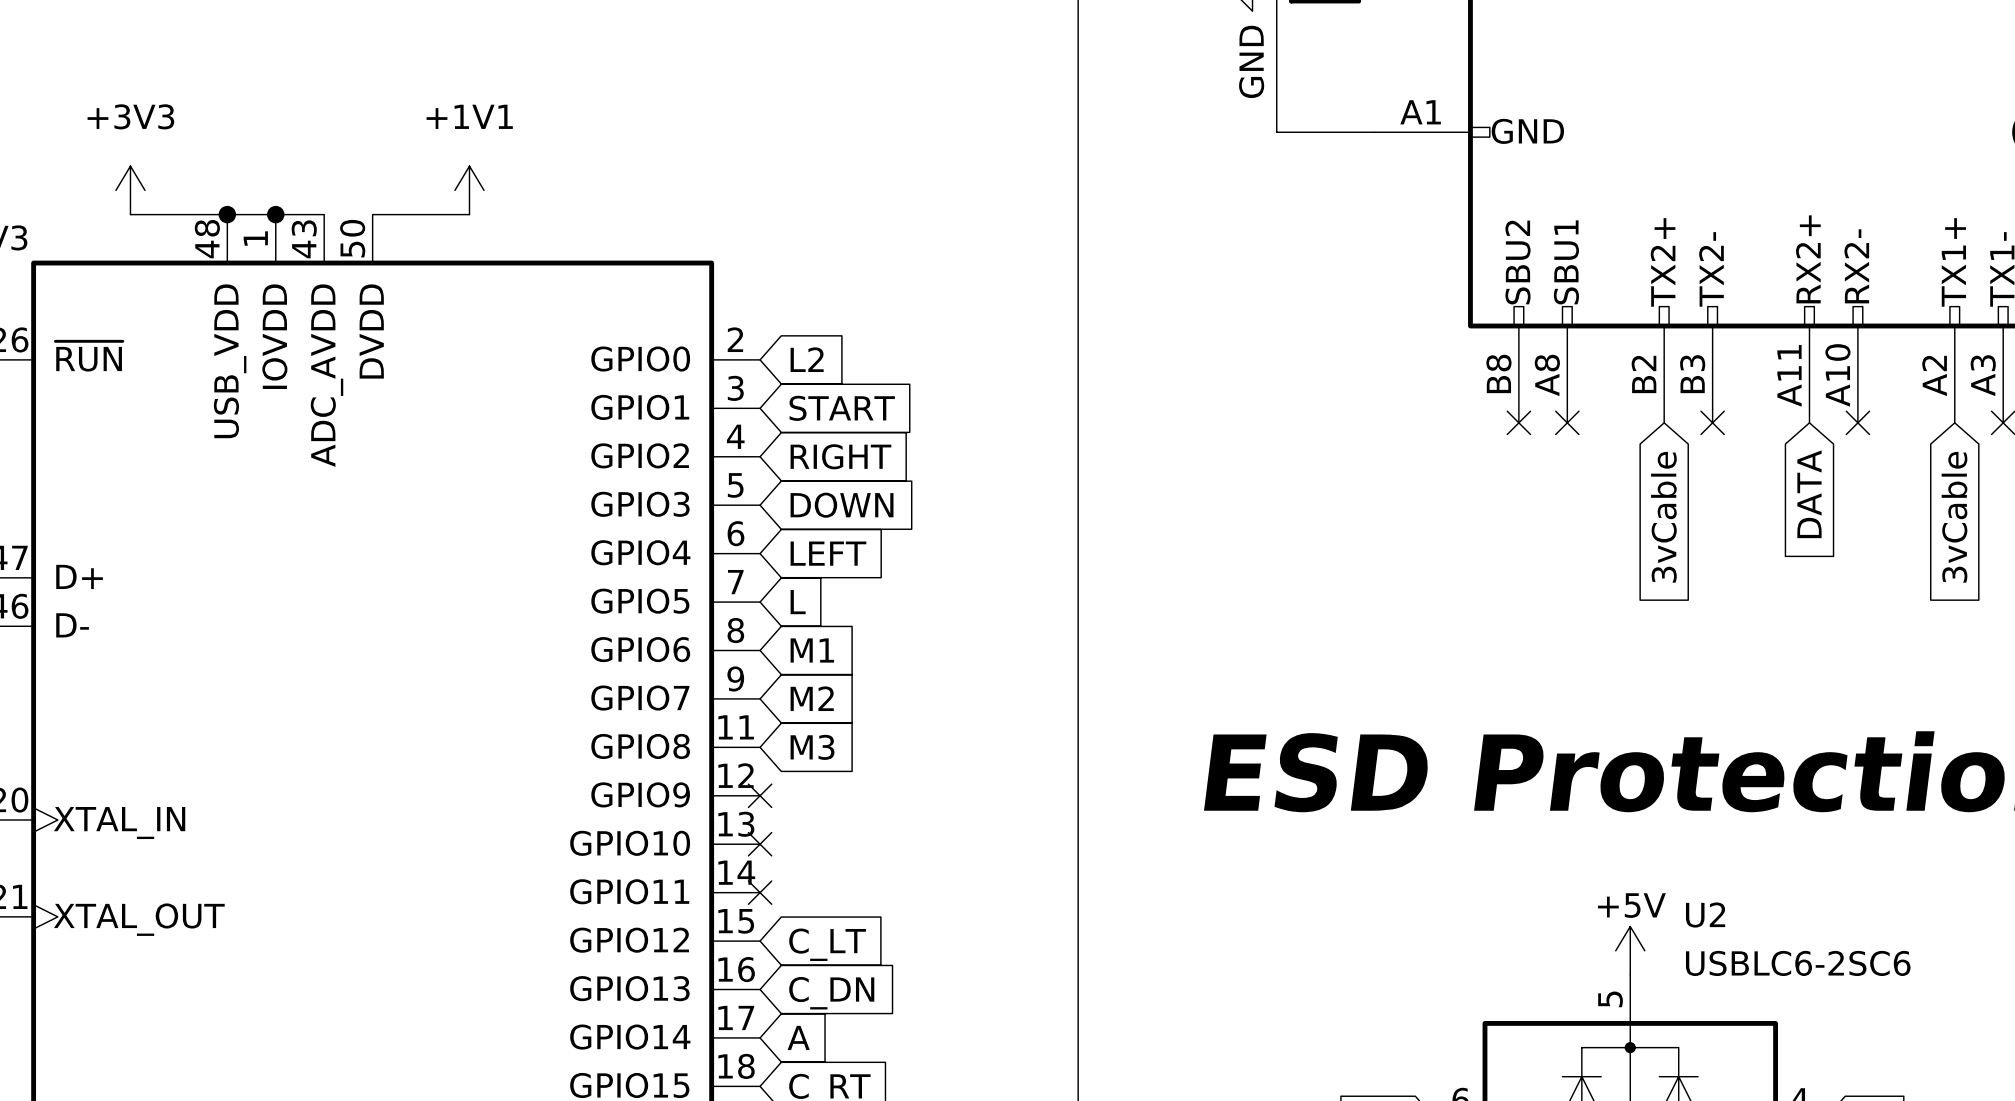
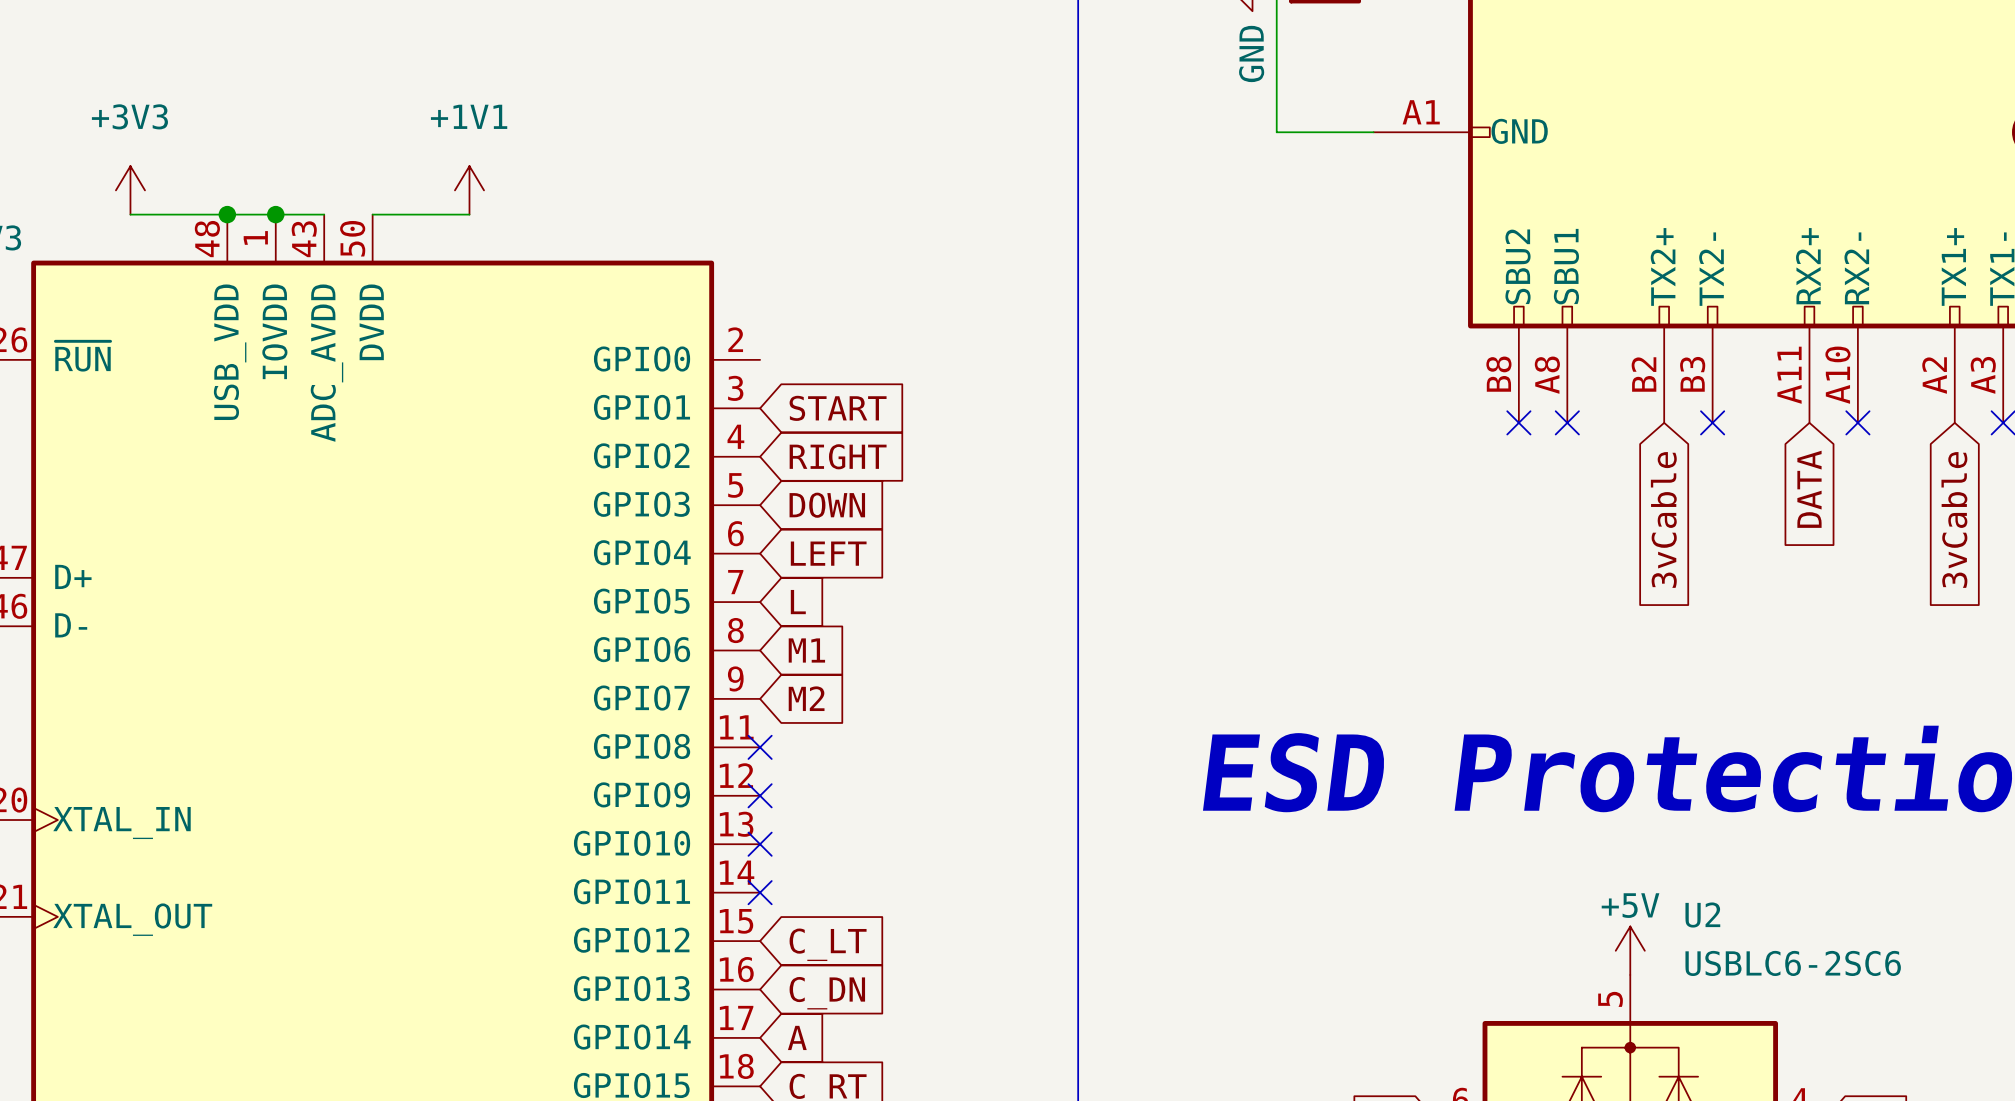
global label: L2 (807, 359) -> none
no-connect mark: none -> (760, 747)
global label: M3 (812, 747) -> none

